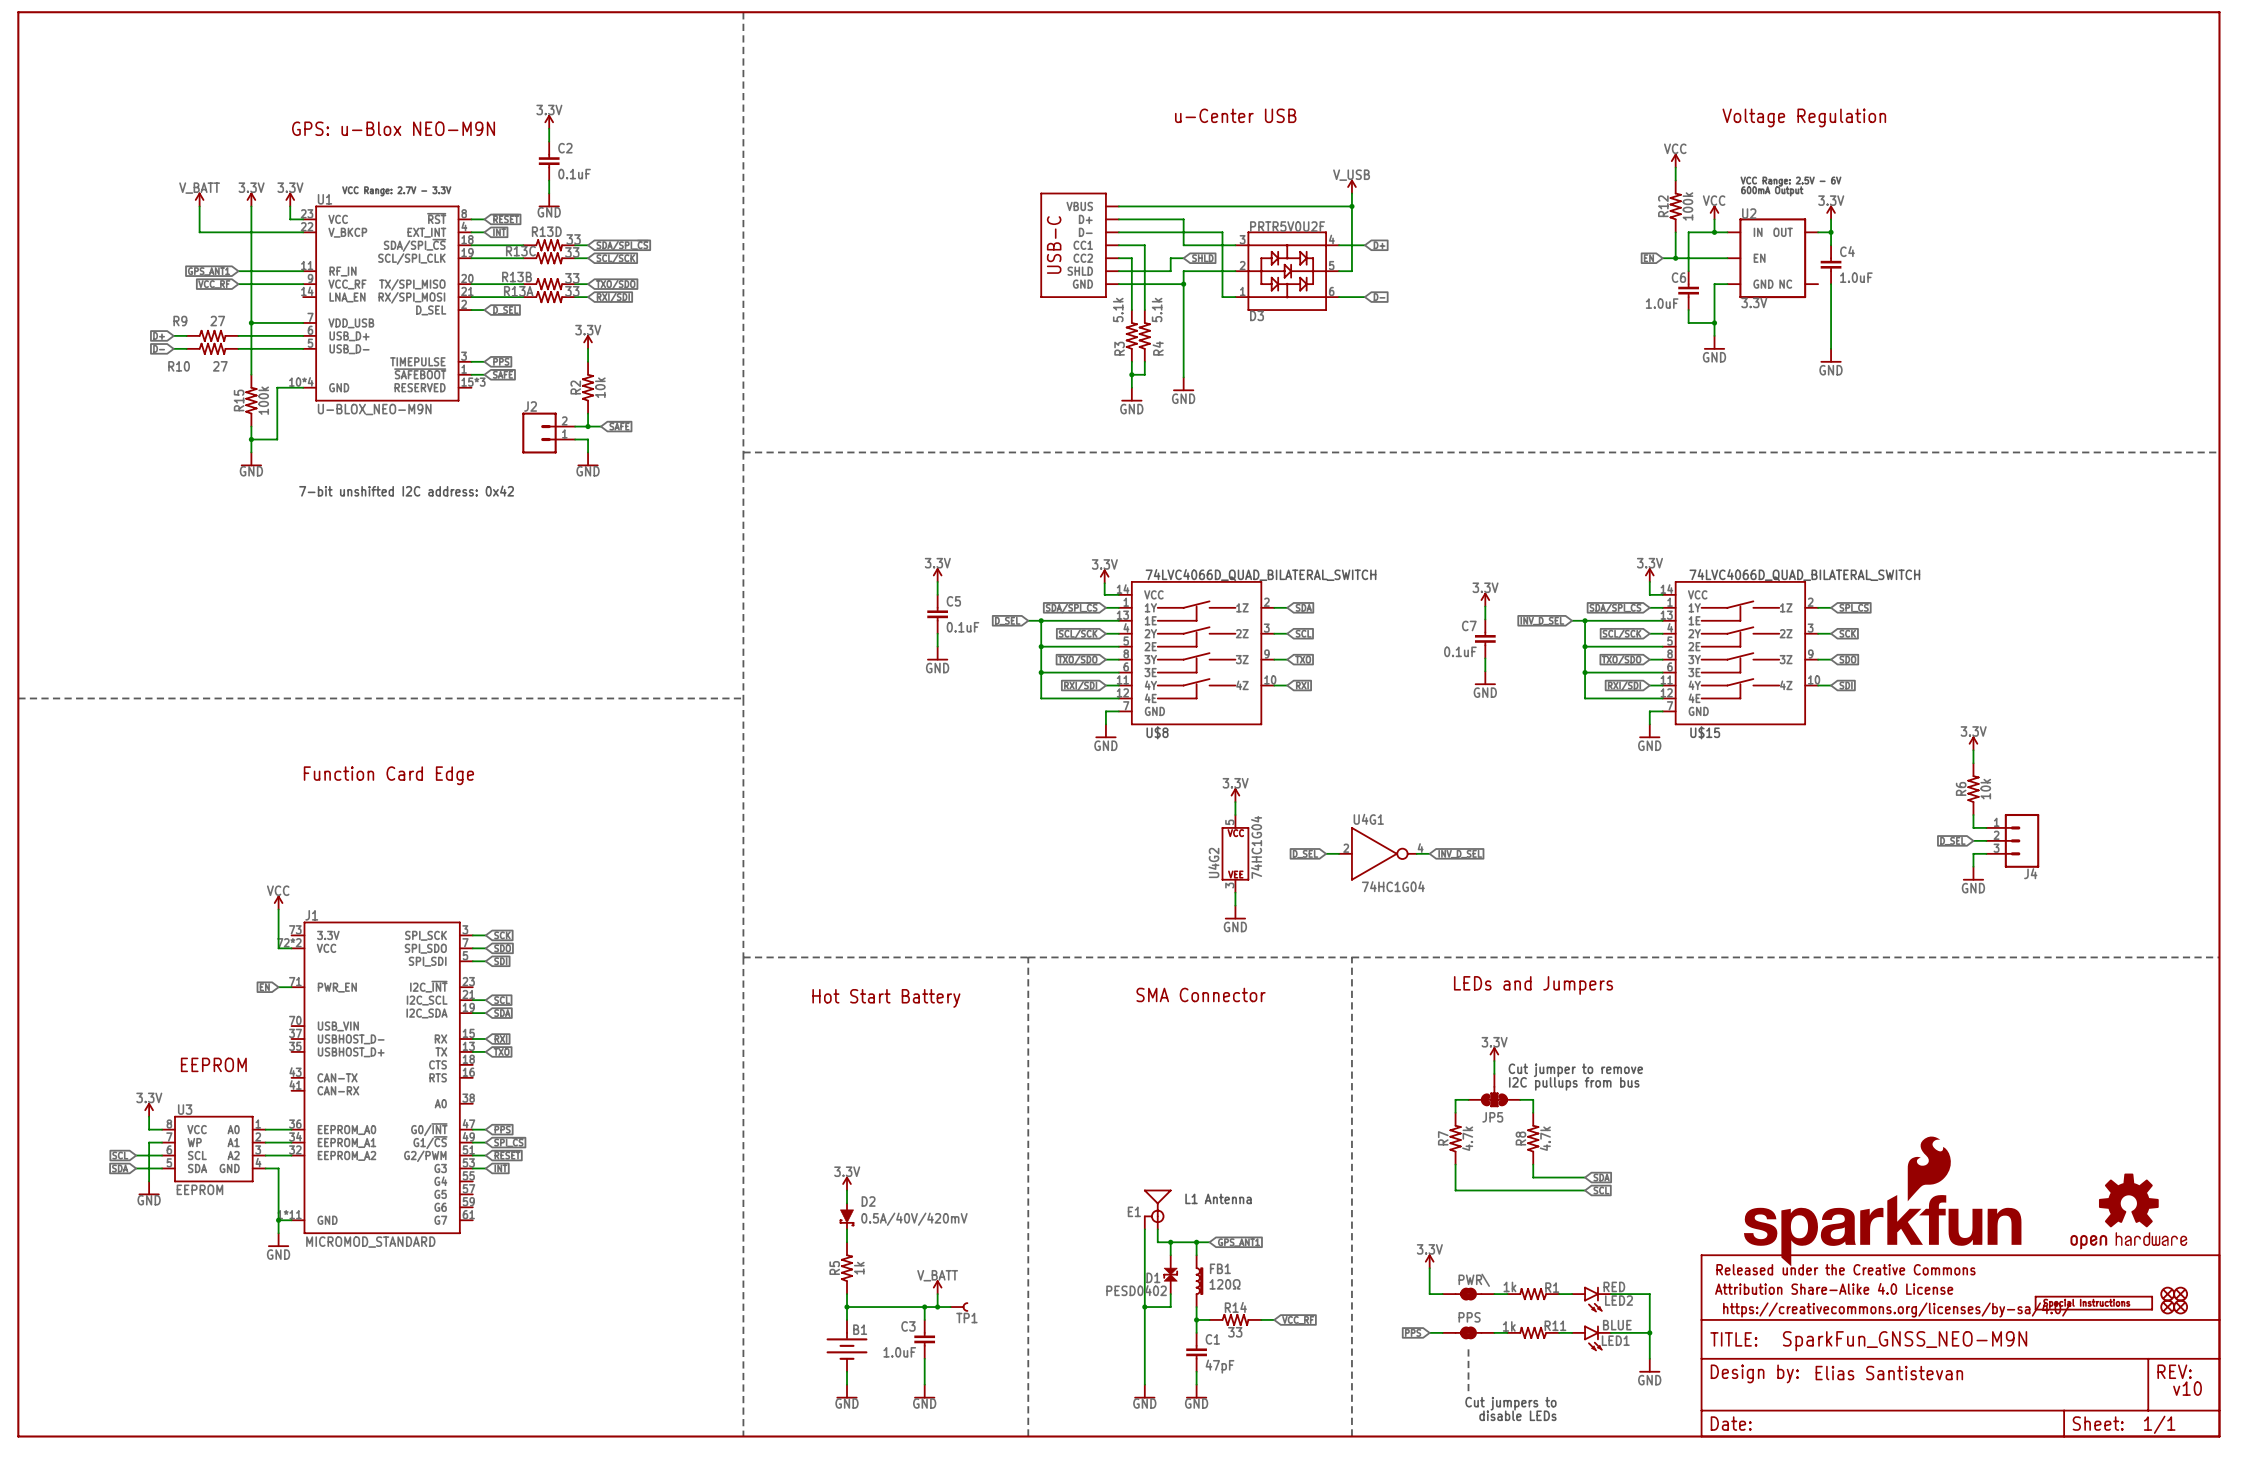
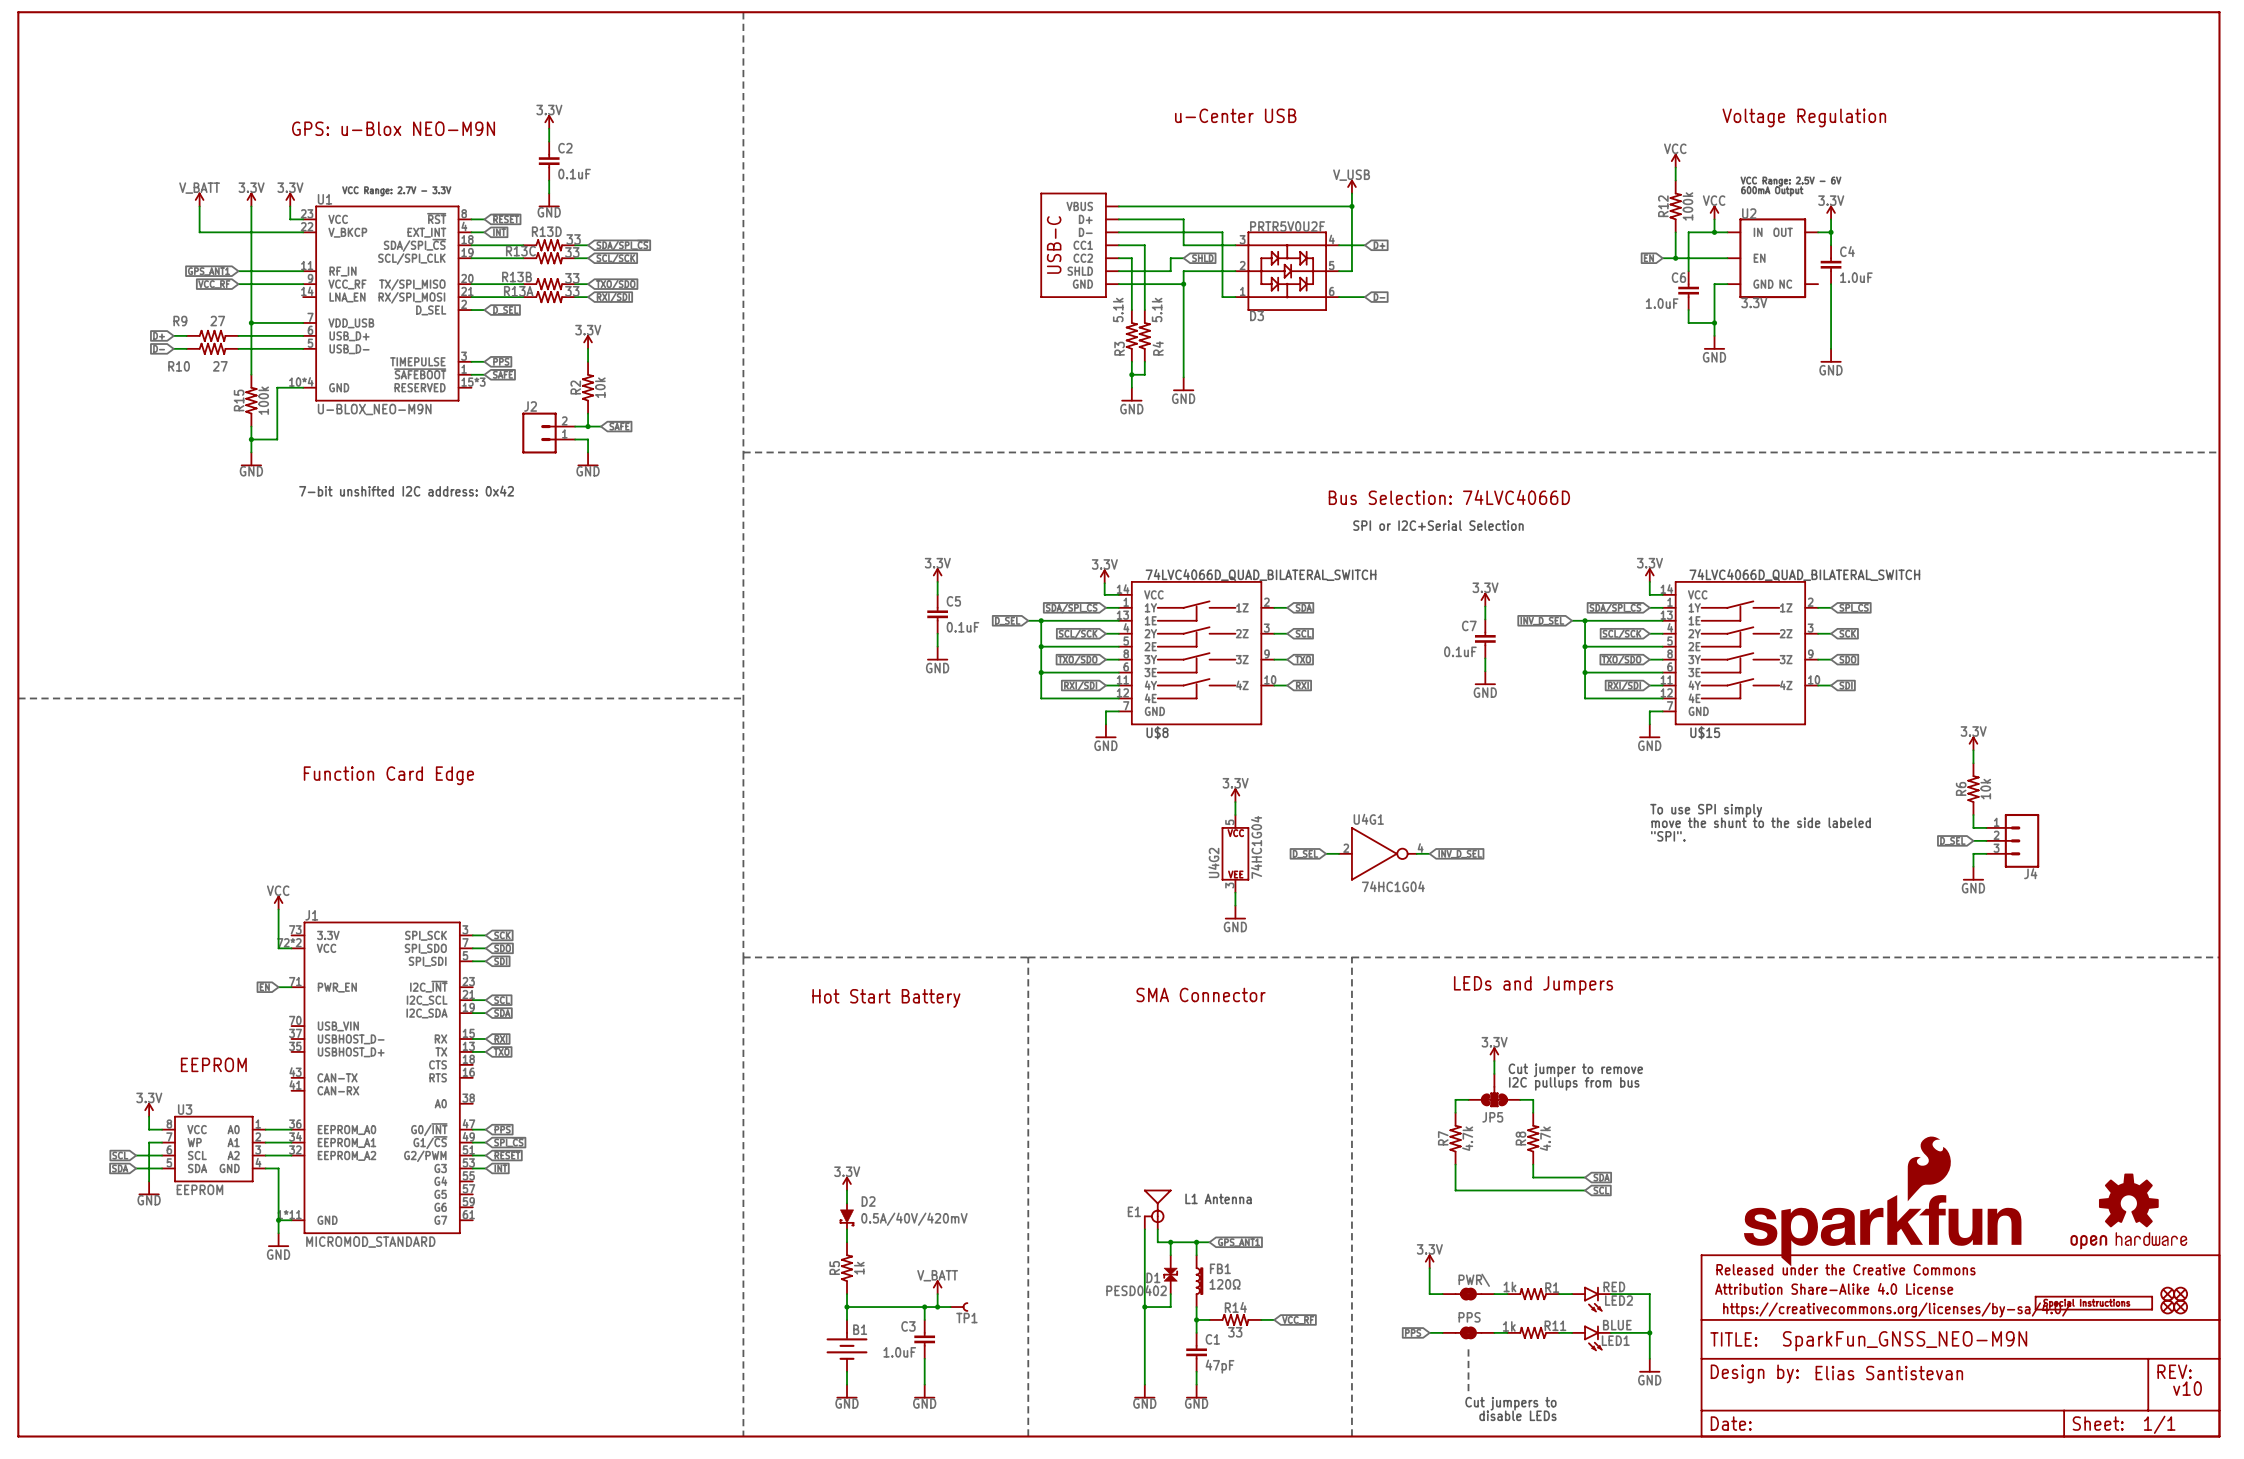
text: none -> Bus Selection: 74LVC4066D (1449, 497)
text: none -> SPI or I2C+Serial Selection (1438, 525)
text: none -> To use SPI simply (1706, 810)
text: none -> move the shunt to the side labeled (1761, 822)
text: none -> "SPI". (1668, 836)

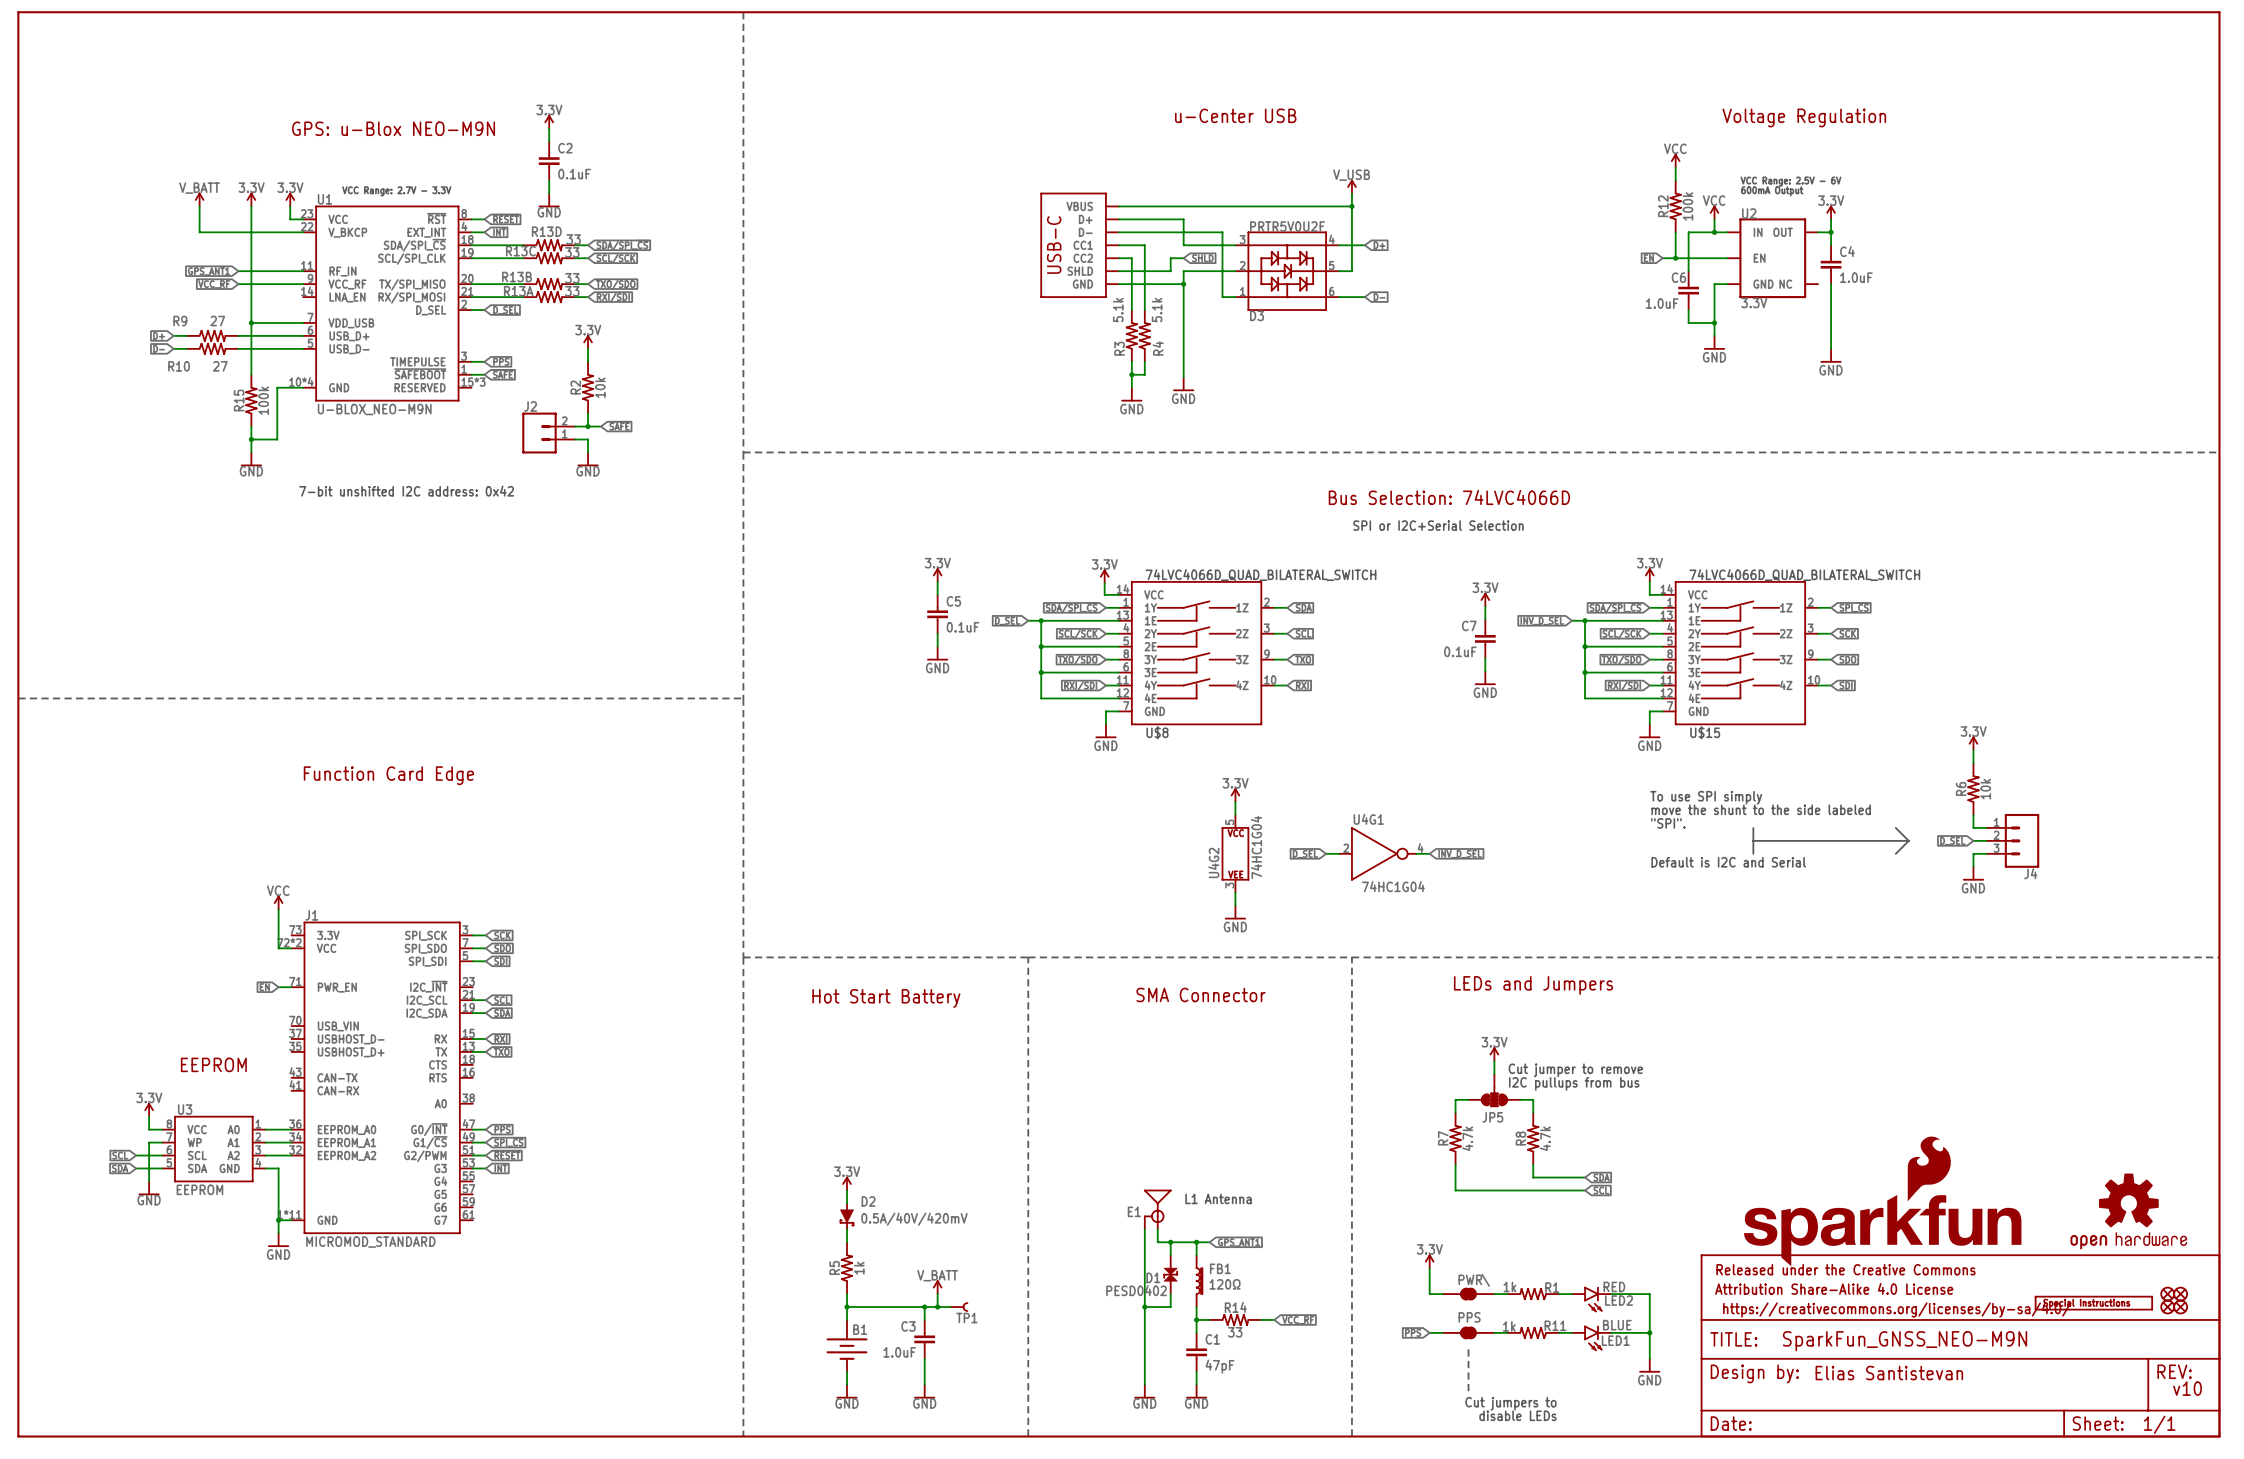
text: none -> To use SPI simply (1706, 797)
text: To use SPI simply (1706, 810) -> move the shunt to the side labeled (1761, 809)
text: move the shunt to the side labeled (1761, 822) -> "SPI". (1668, 823)
line: none -> (1753, 827) (1753, 853)
line: none -> (1895, 827) (1908, 840)
text: "SPI". (1668, 836) -> none
line: none -> (1753, 840) (1908, 840)
line: none -> (1908, 840) (1895, 853)
text: none -> Default is I2C and Serial (1728, 862)

